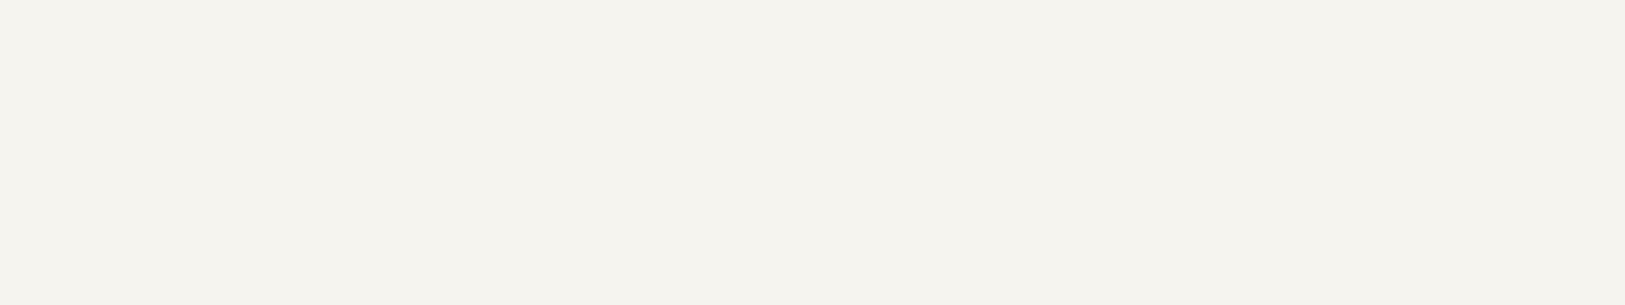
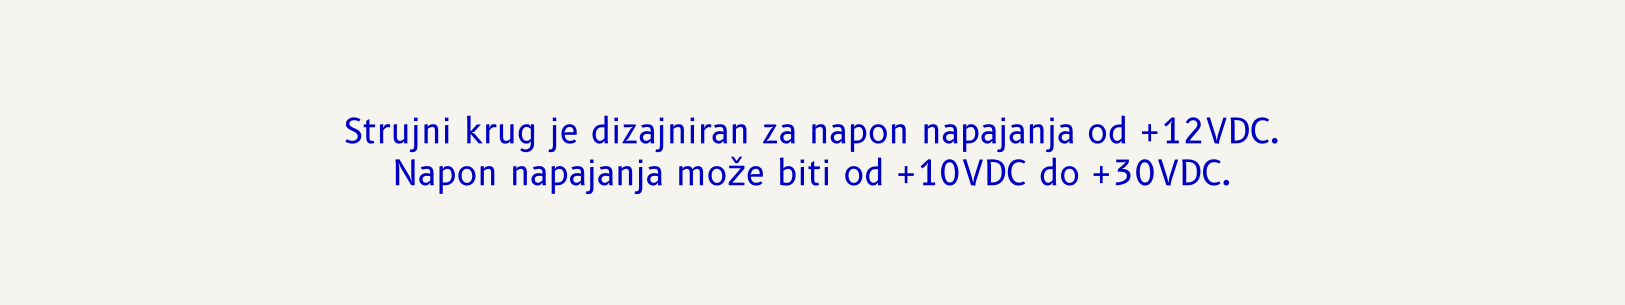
text: none -> Strujni krug je dizajniran za napon napajanja od +12VDC. (811, 133)
text: none -> Napon napajanja može biti od +10VDC do +30VDC. (812, 175)

